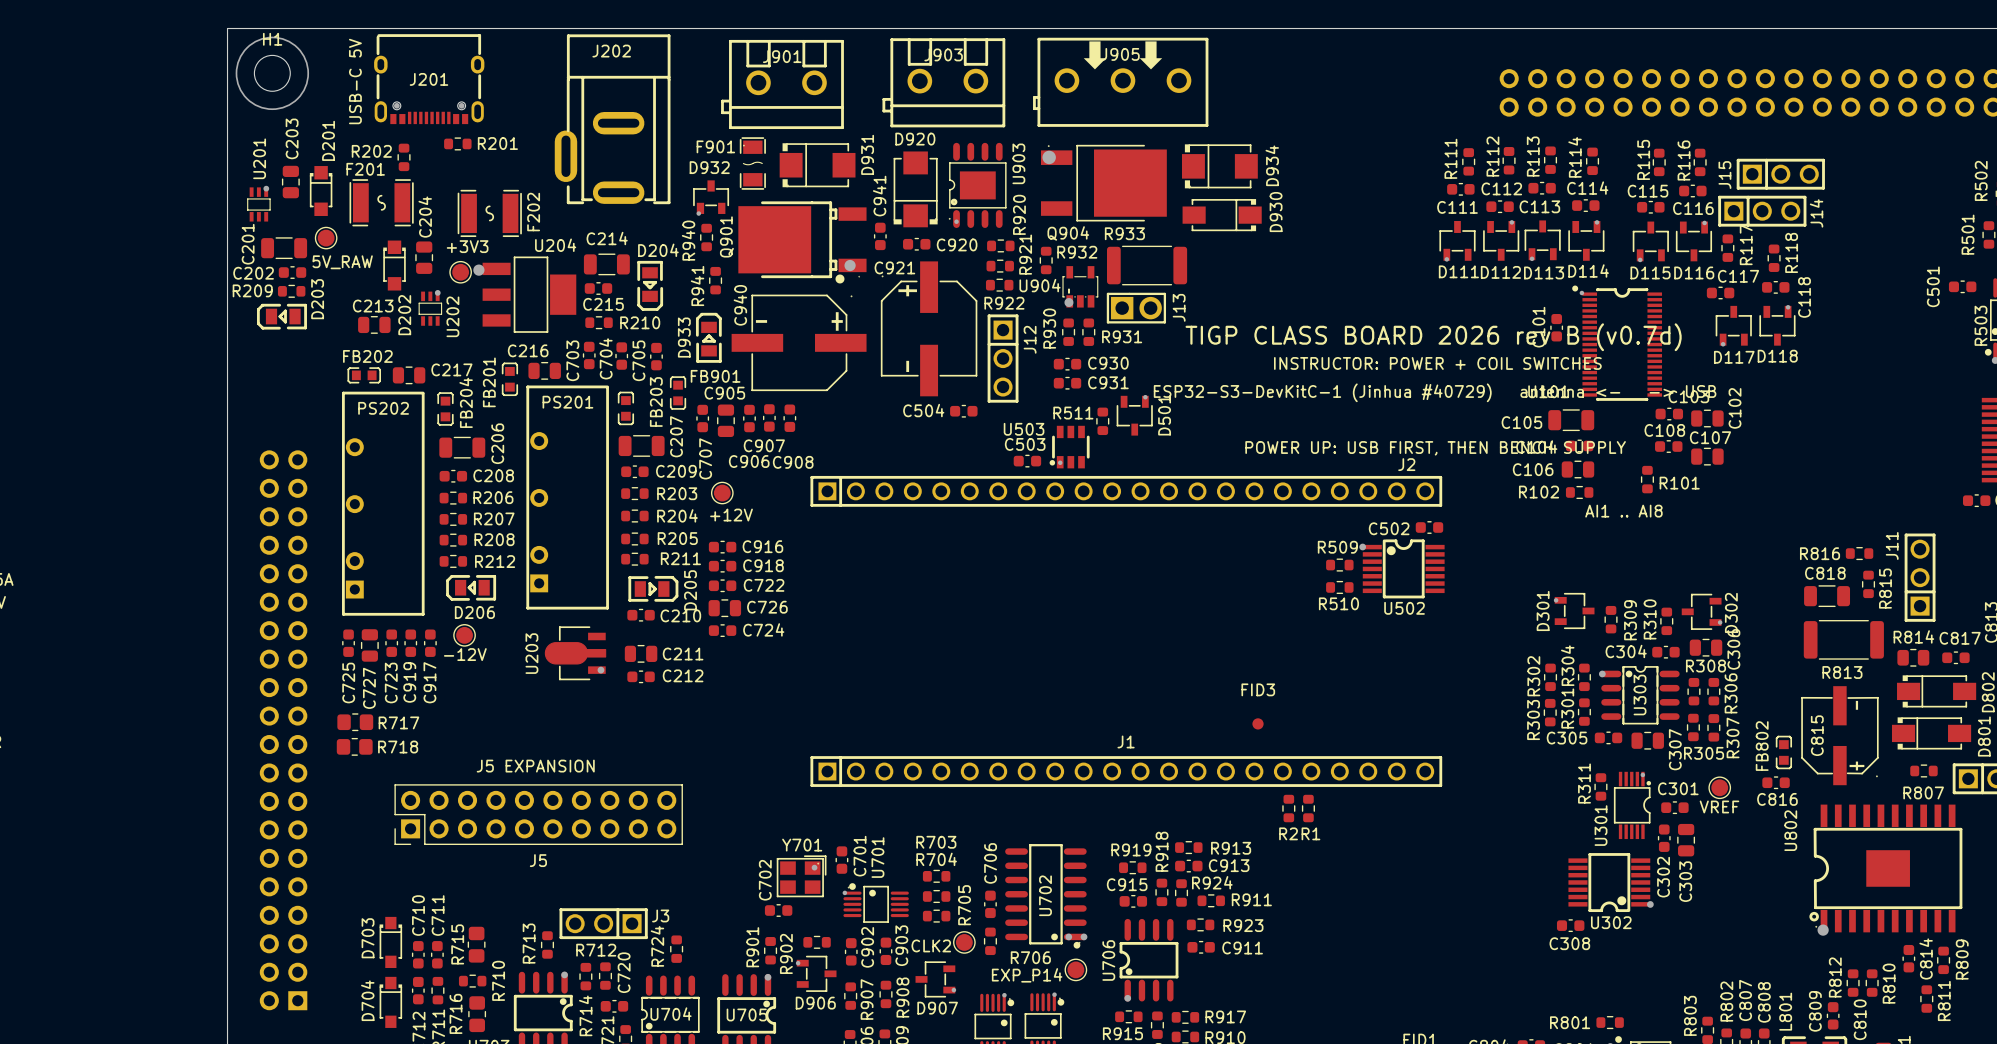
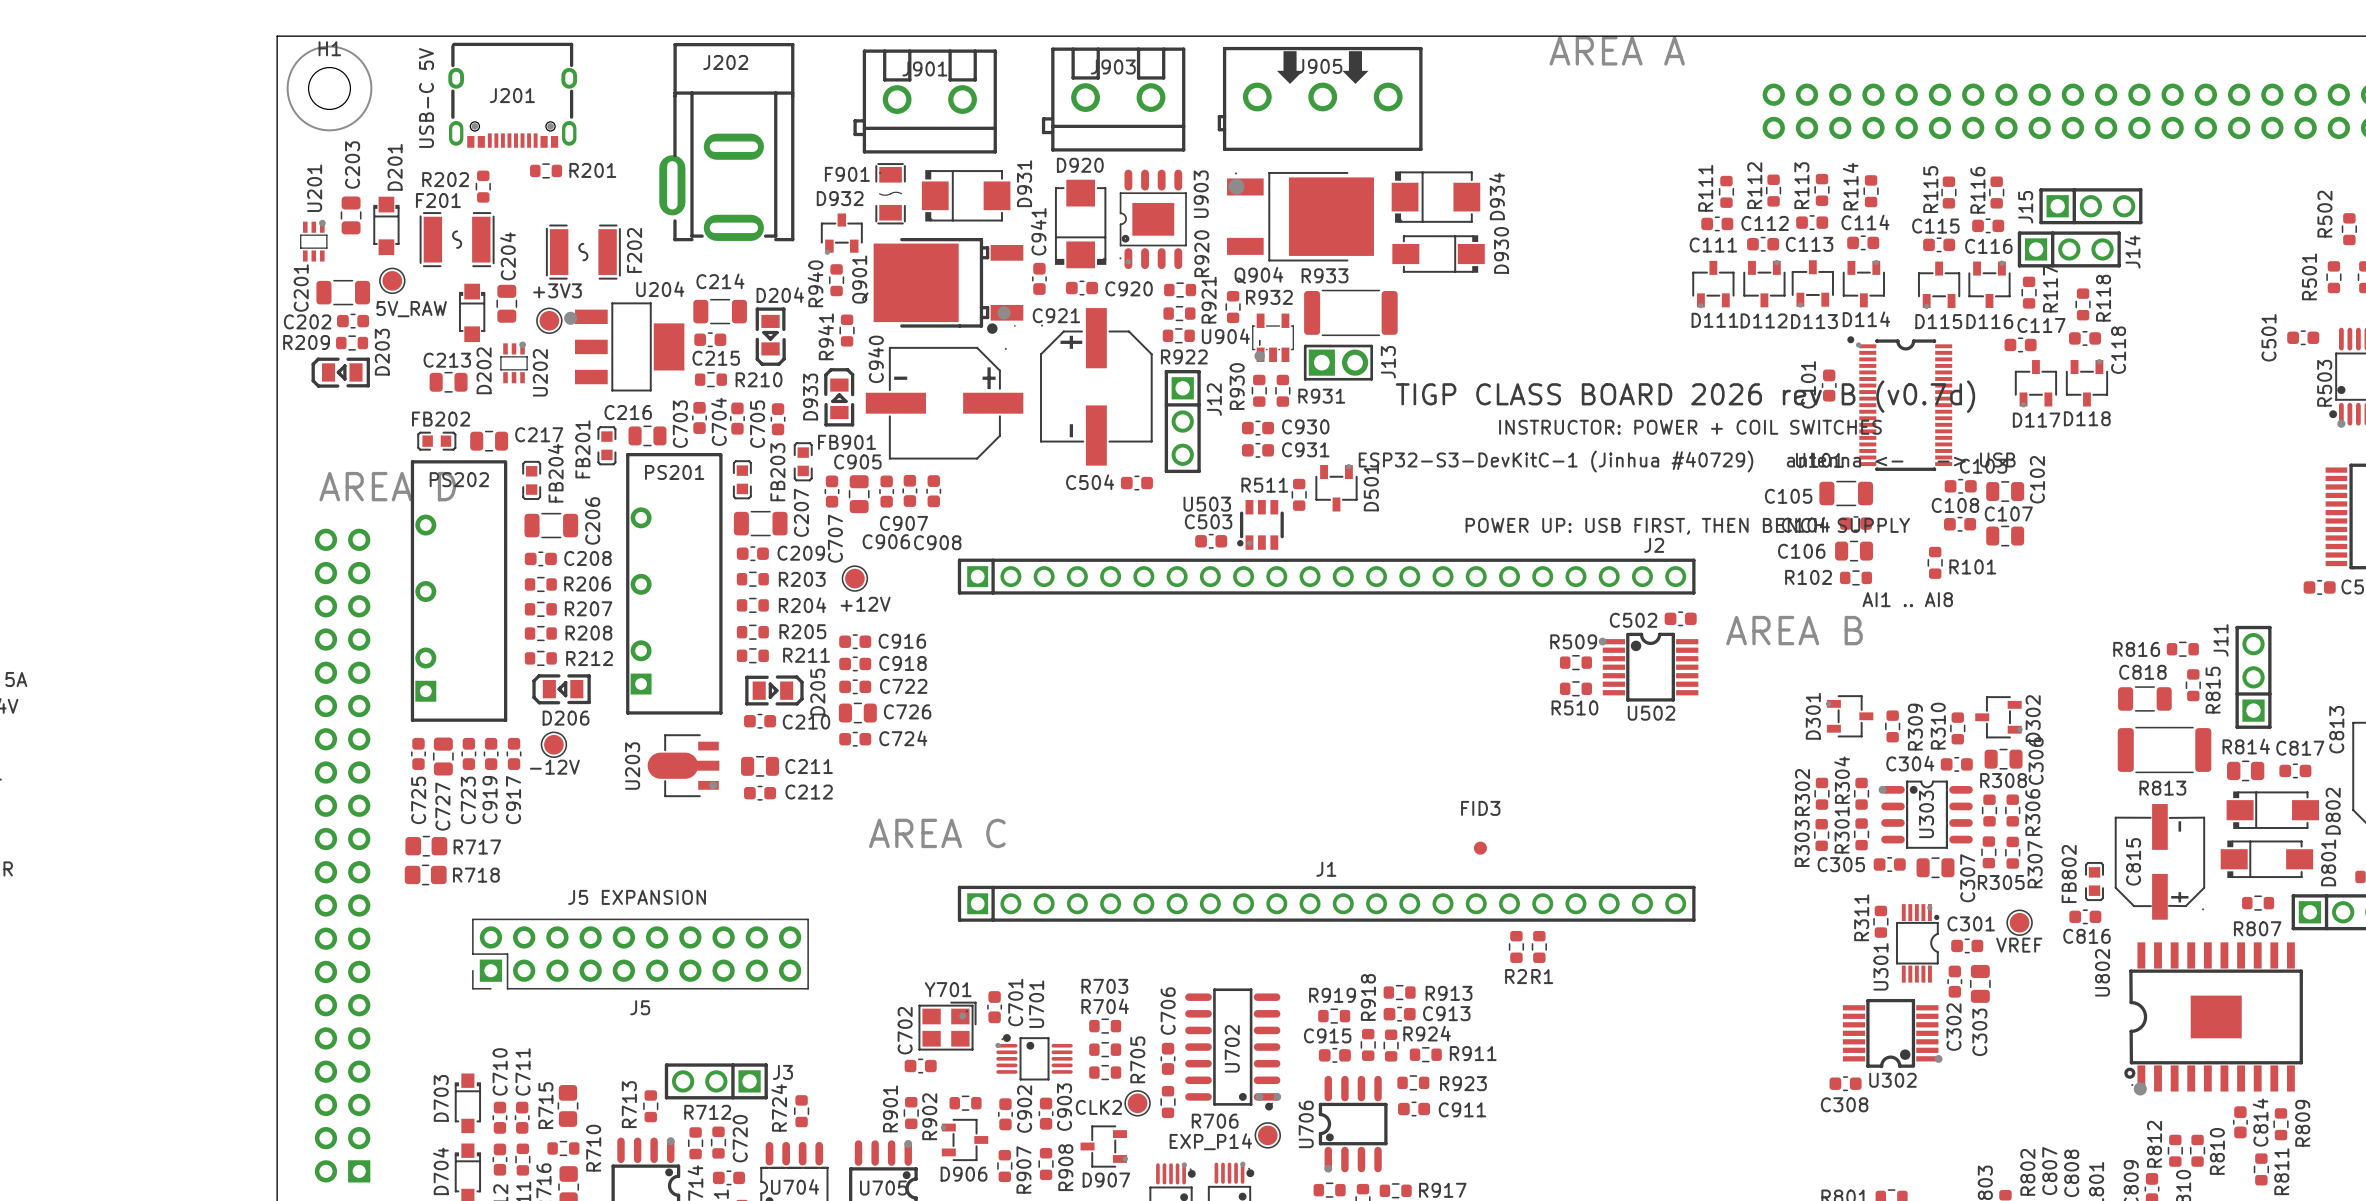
text: none -> AREA A (1617, 50)
text: none -> AREA D (387, 486)
text: none -> AREA B (1794, 630)
text: none -> AREA C (937, 833)

